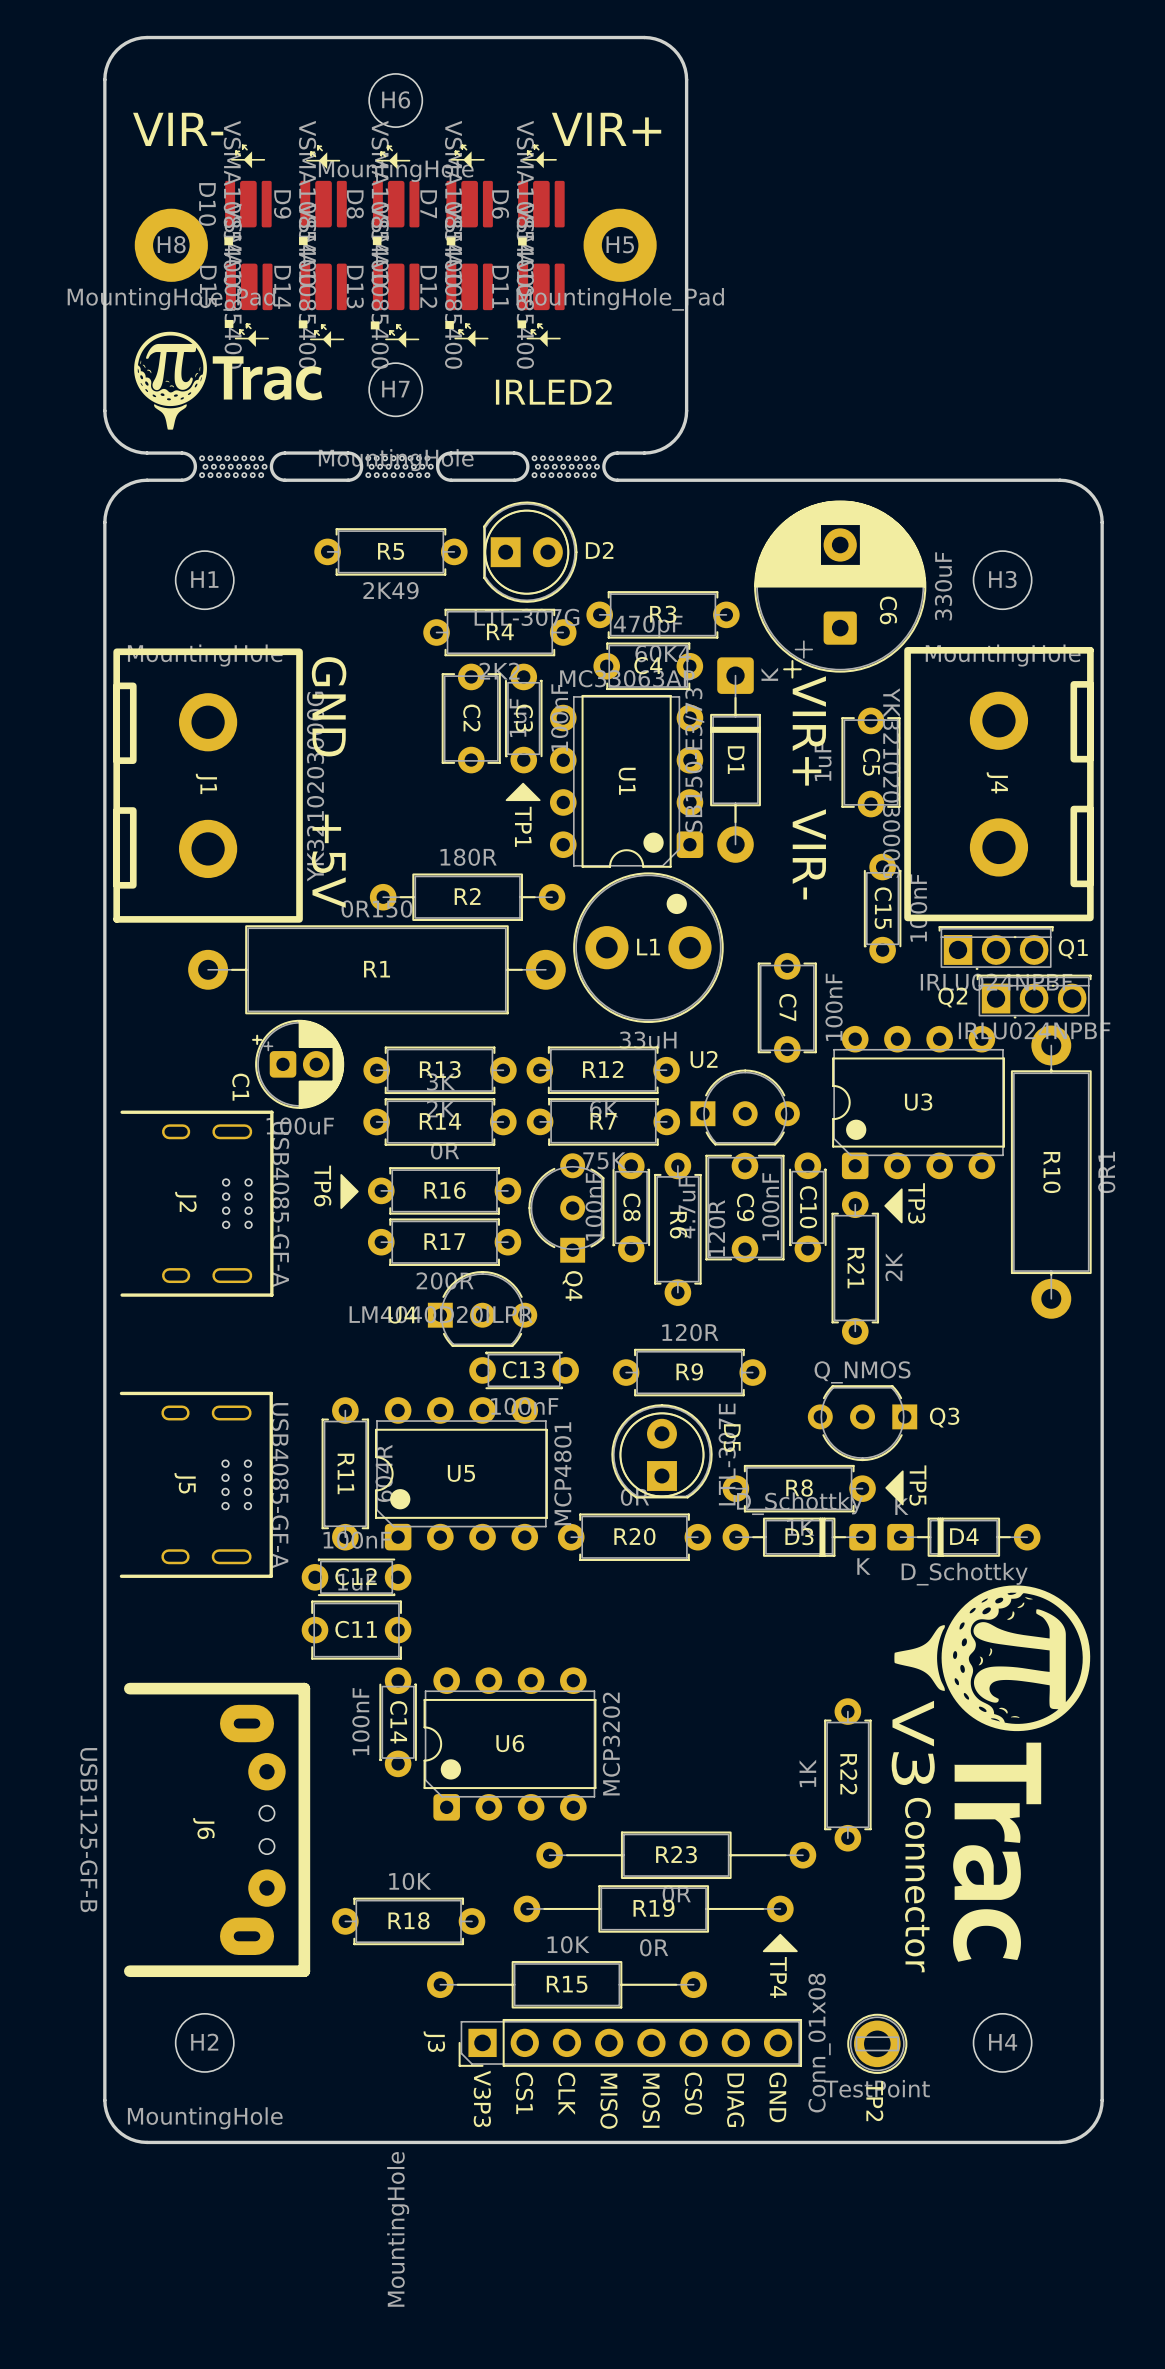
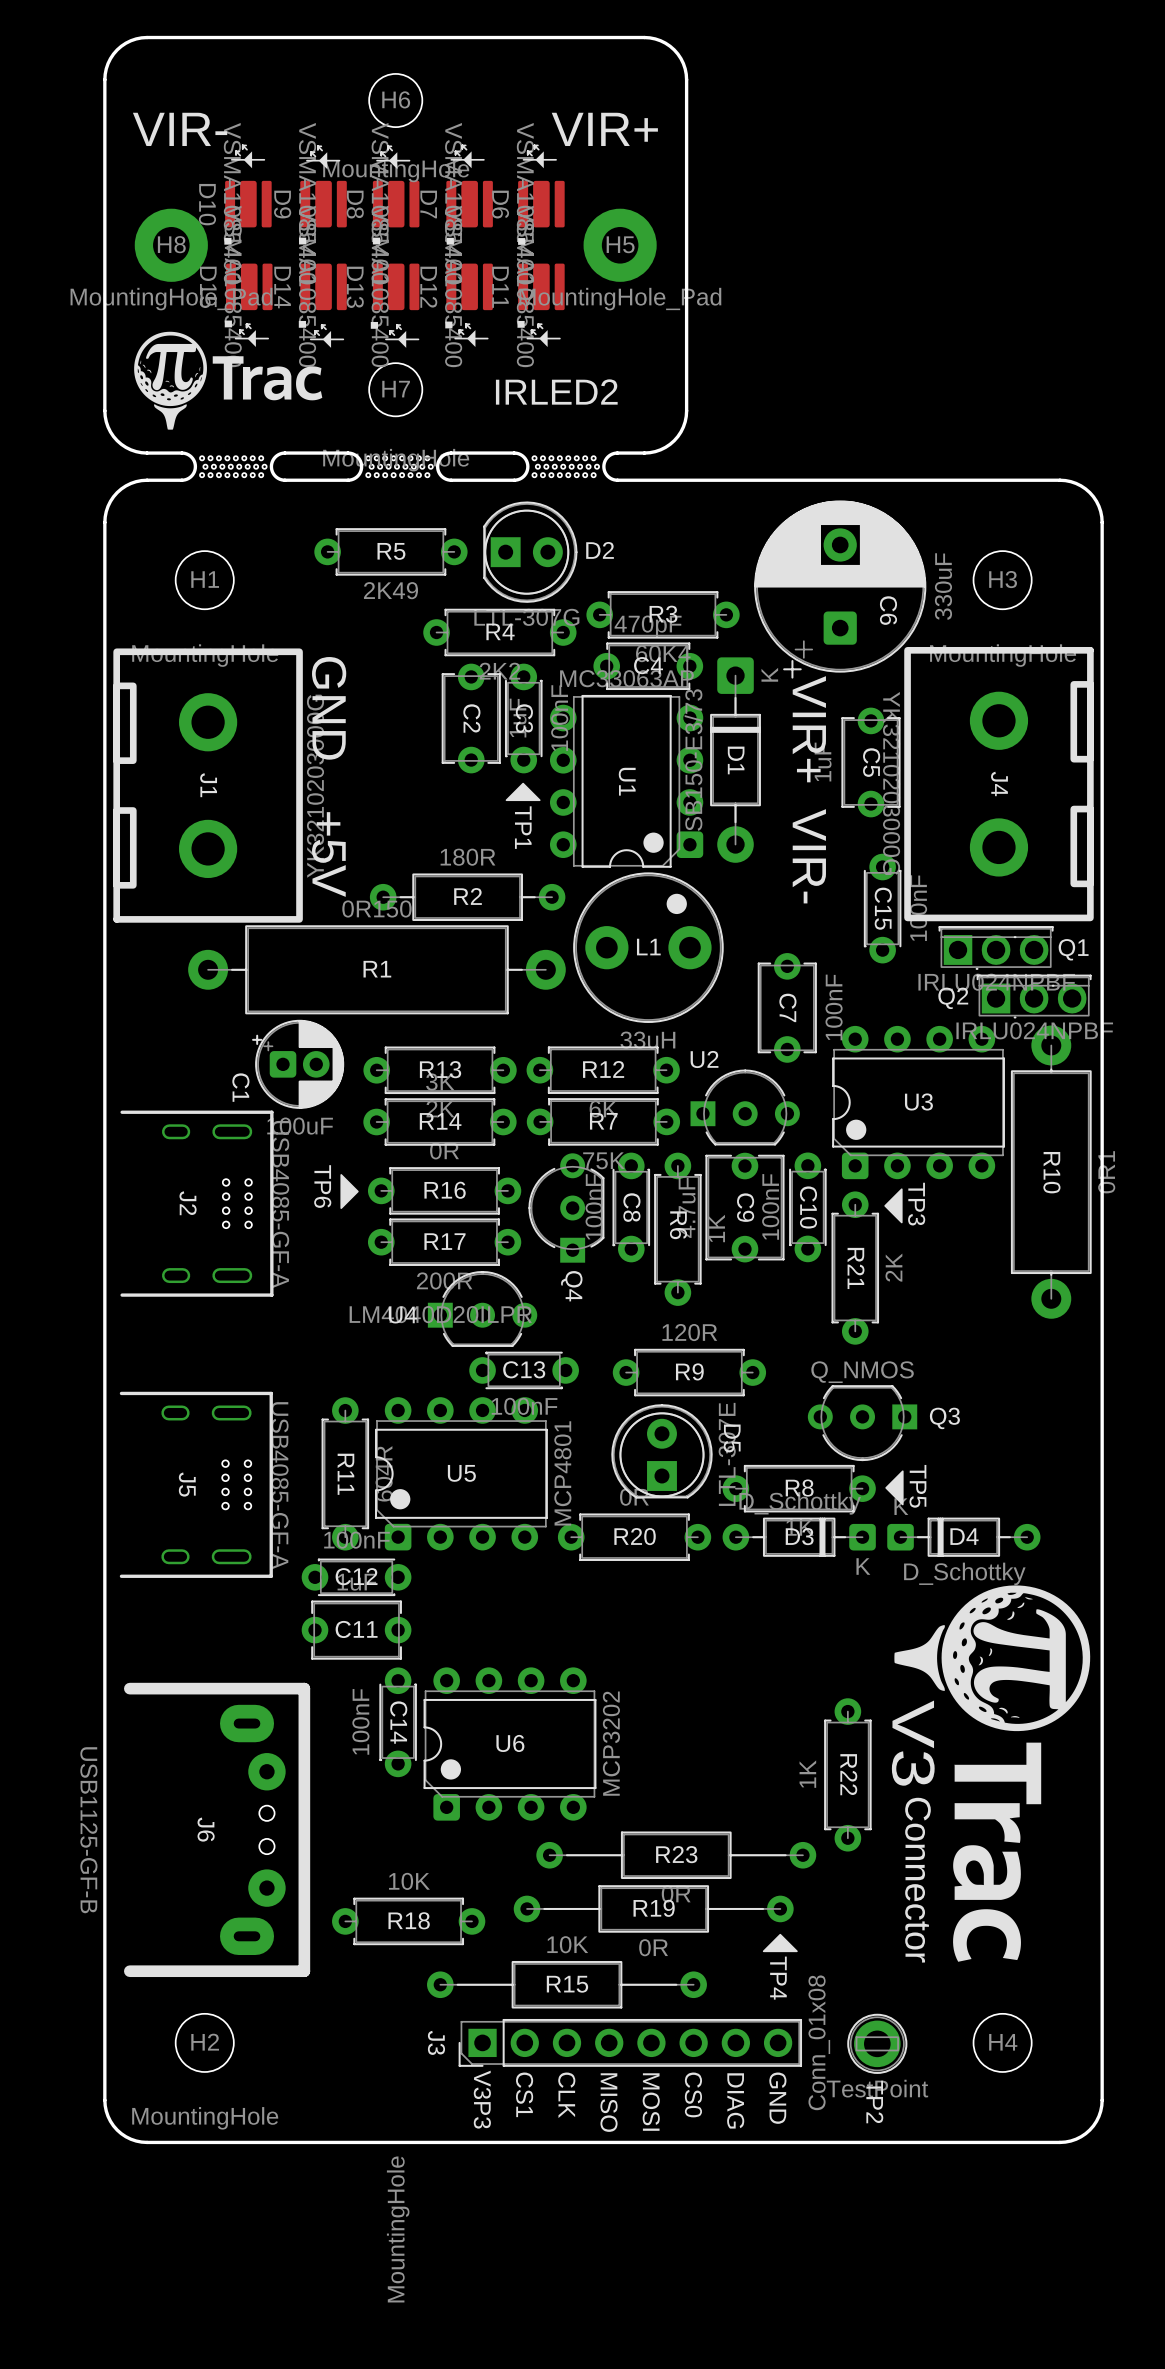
R6 value: 120R (716, 1228) -> 1K (716, 1228)

